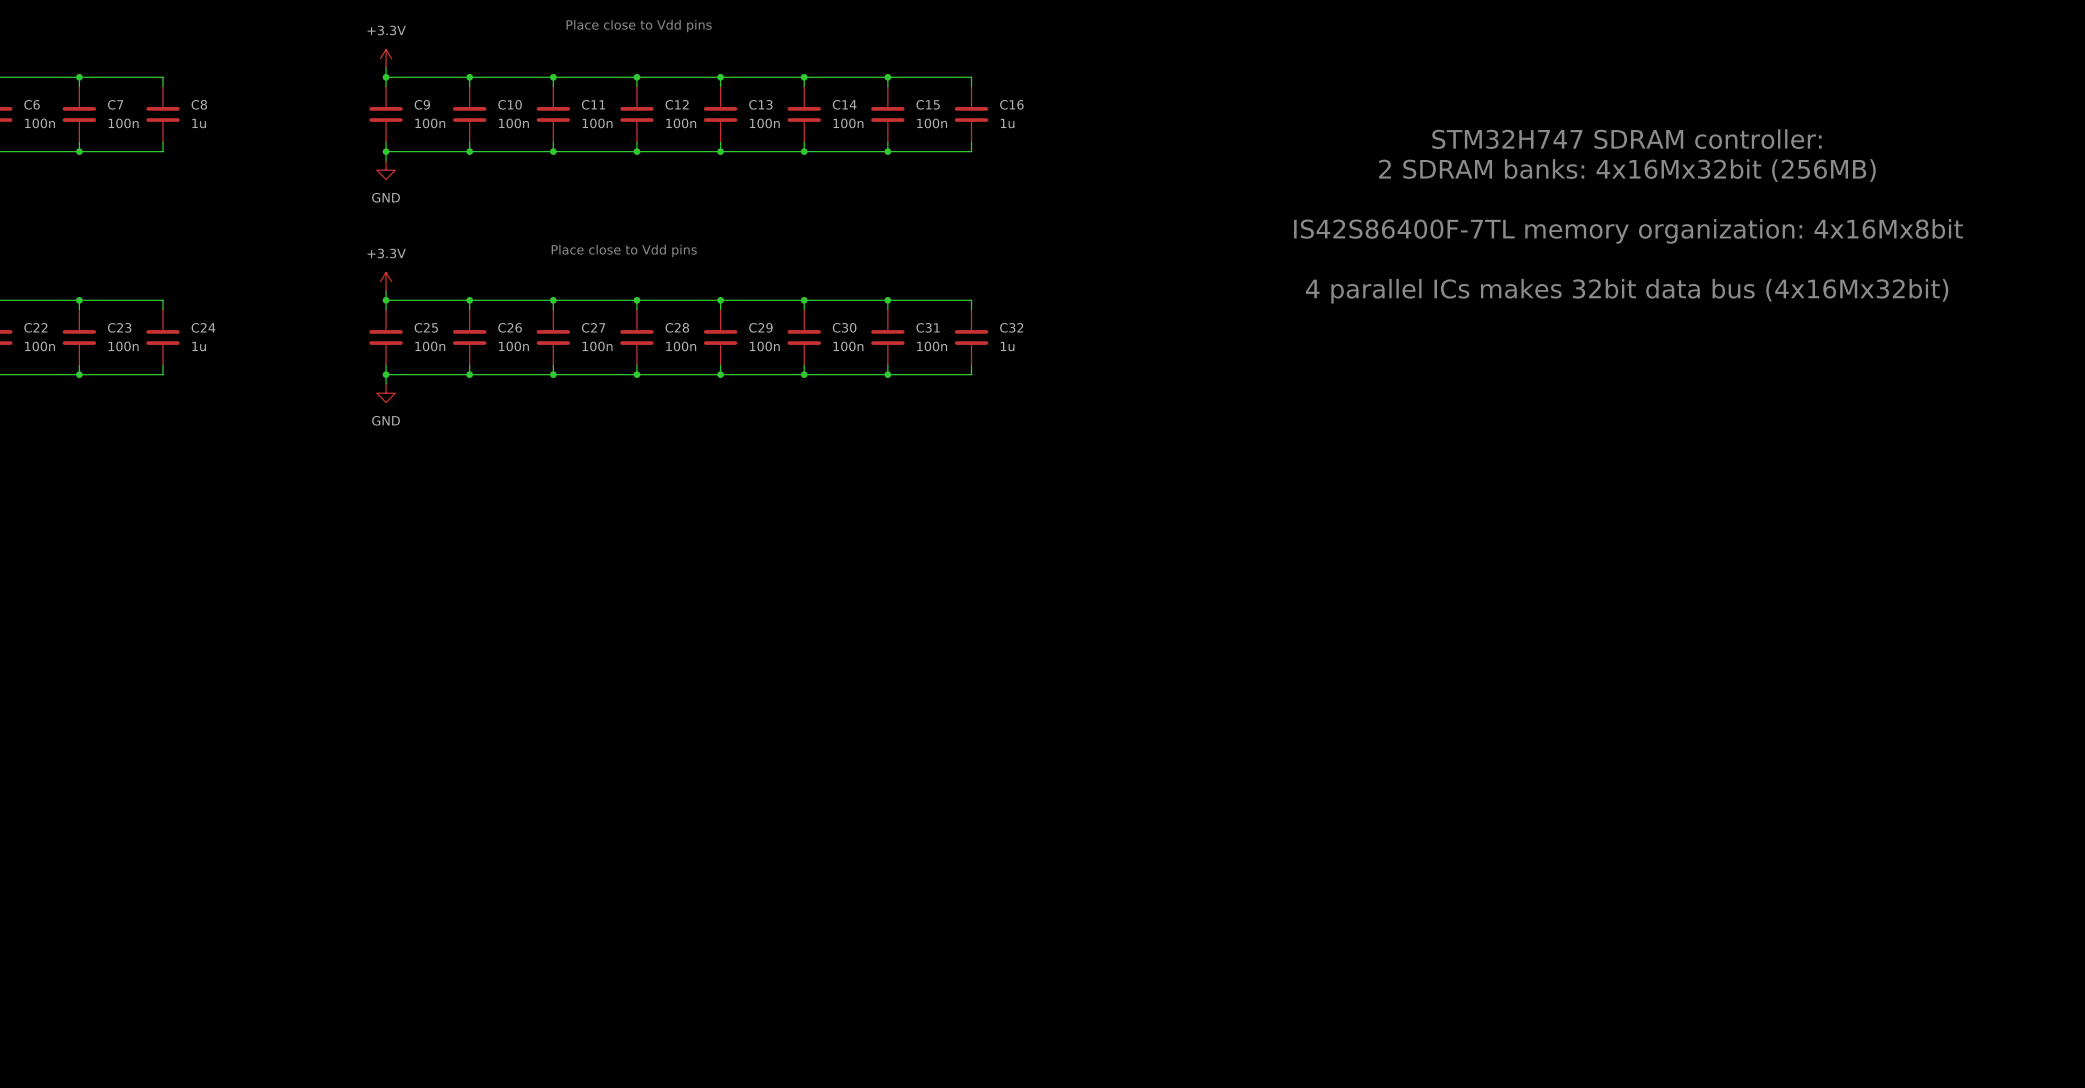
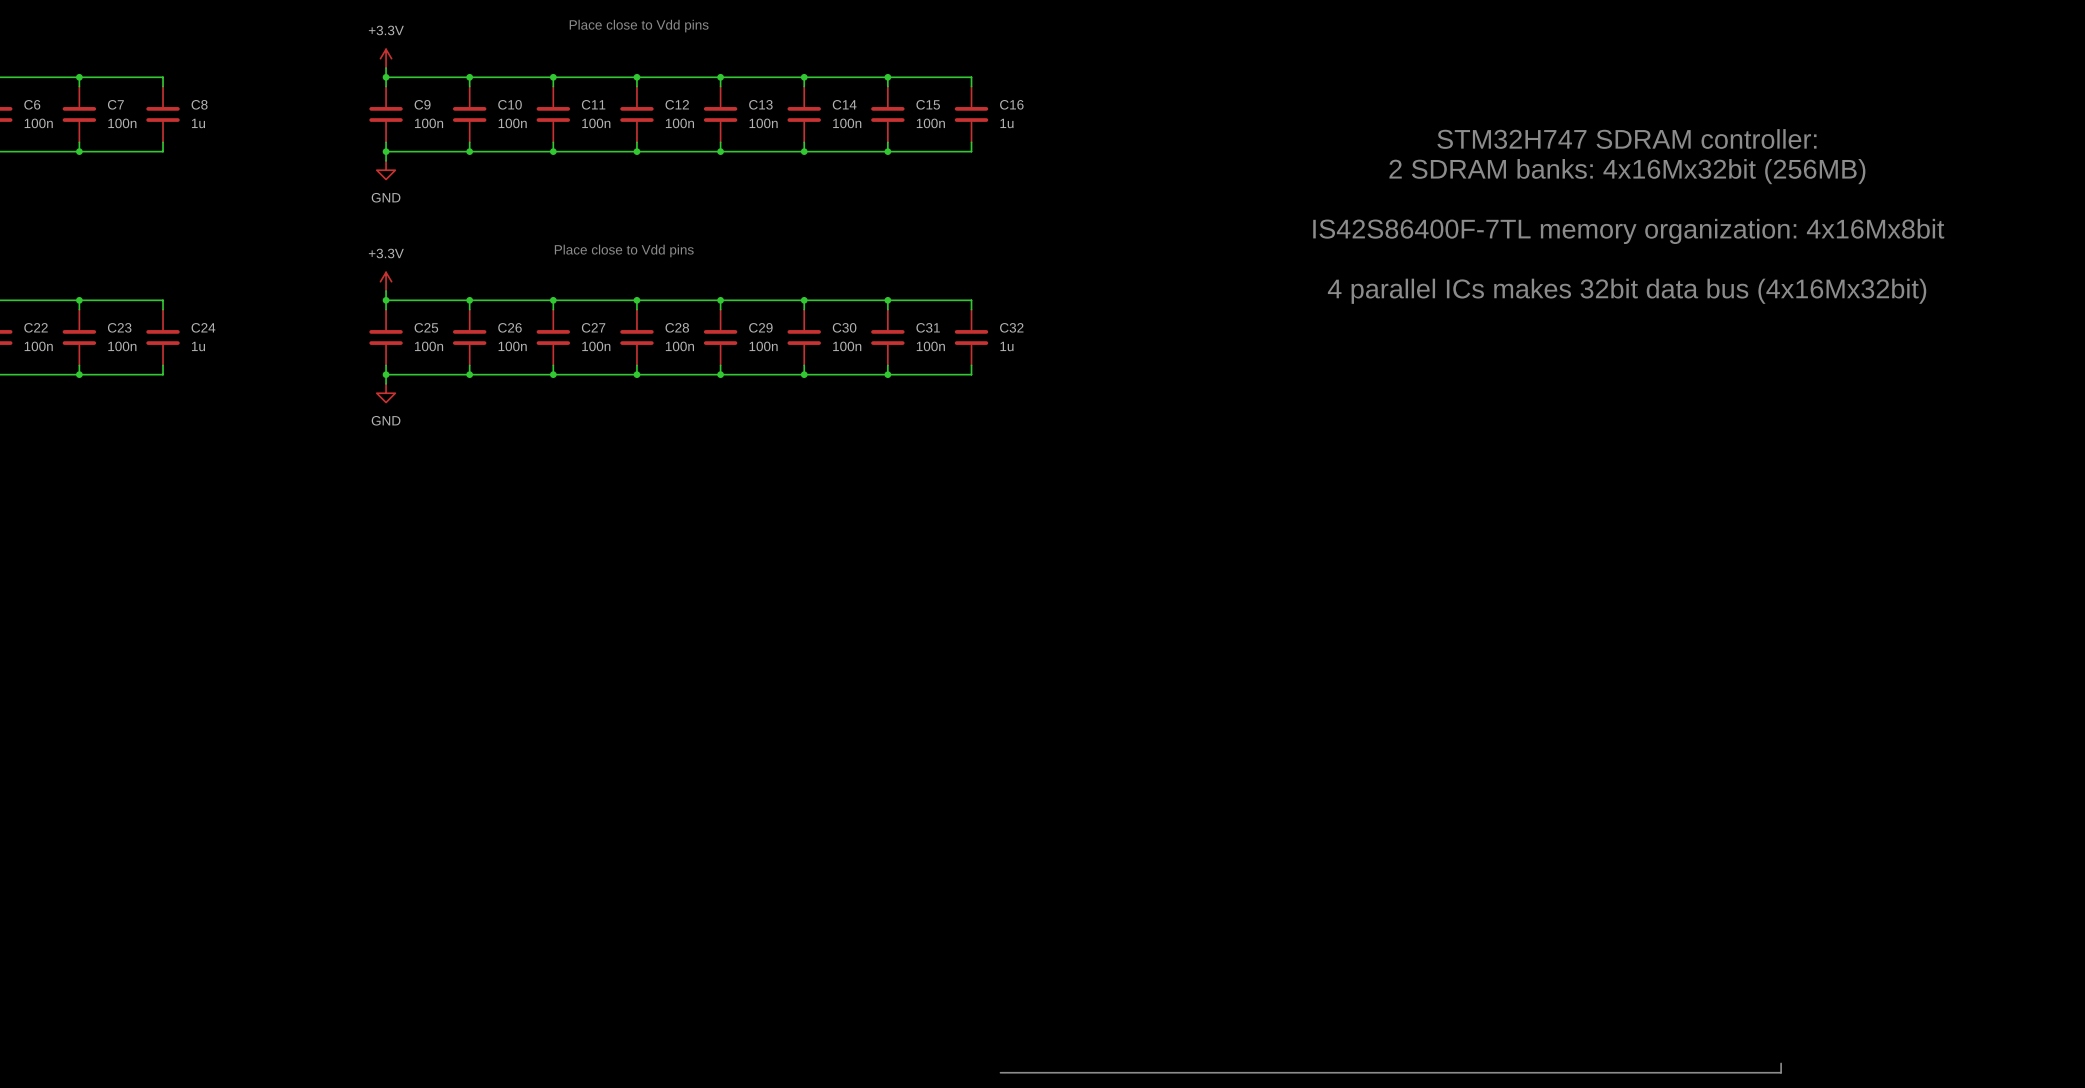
bus: none -> (1781, 1063) (1781, 1072) (1000, 1072)

